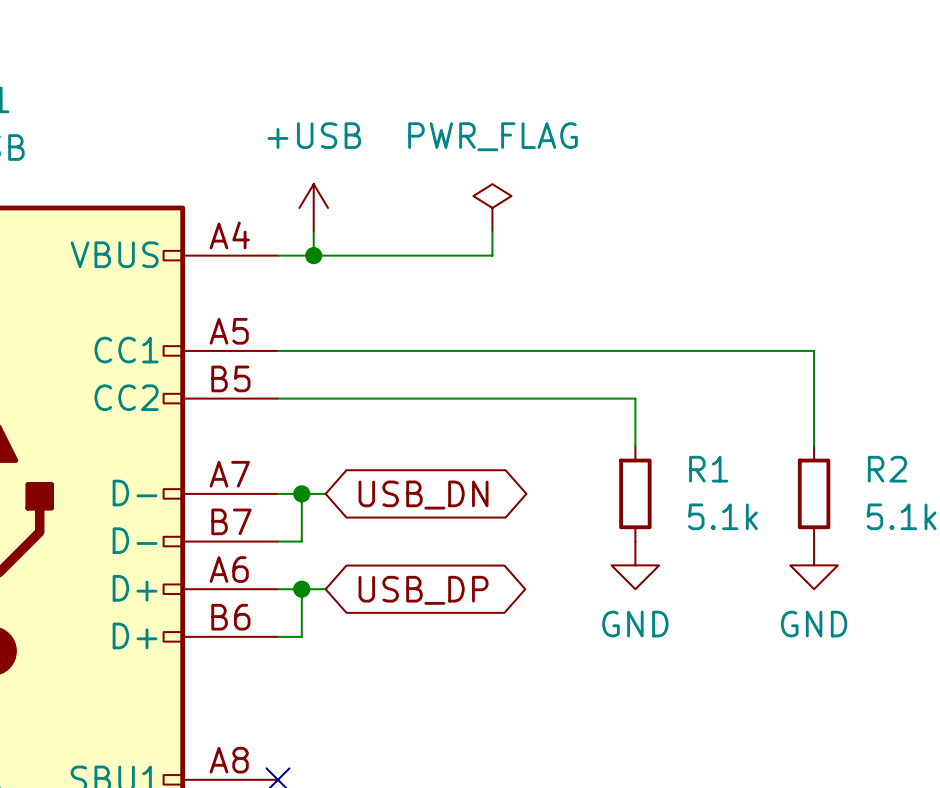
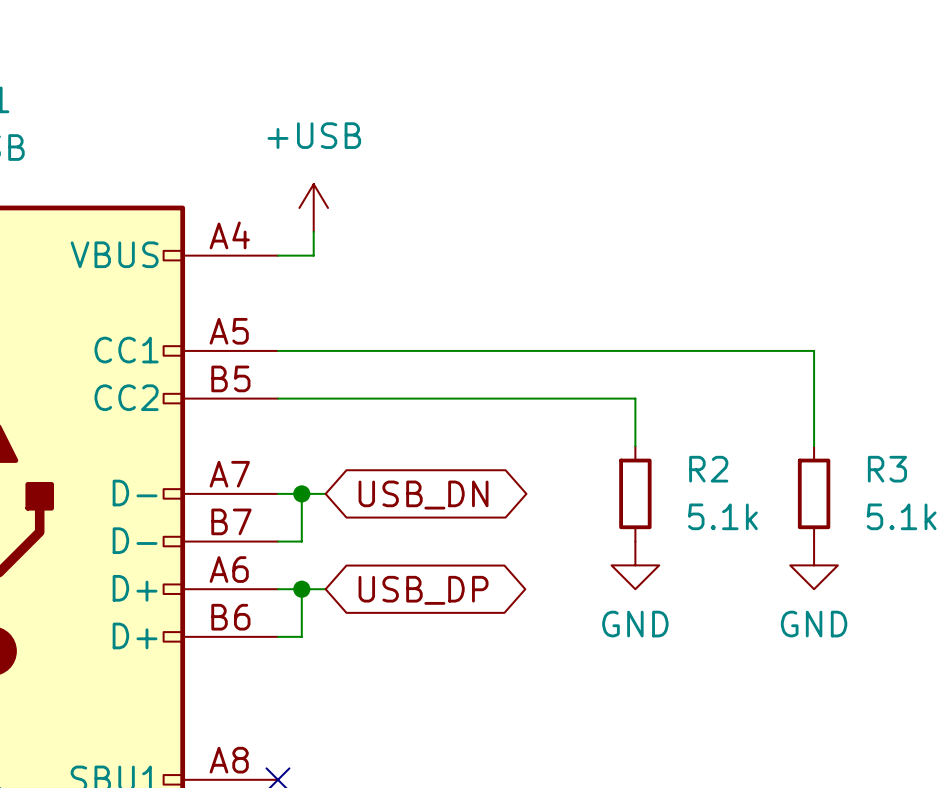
power symbol: PWR_FLAG (492, 207) -> none
wire: (492, 231) (492, 255) (313, 255) -> none
junction: (313, 255) -> none
R1 name: R1 (708, 469) -> R2 (708, 469)
R2 name: R2 (887, 469) -> R3 (887, 469)

